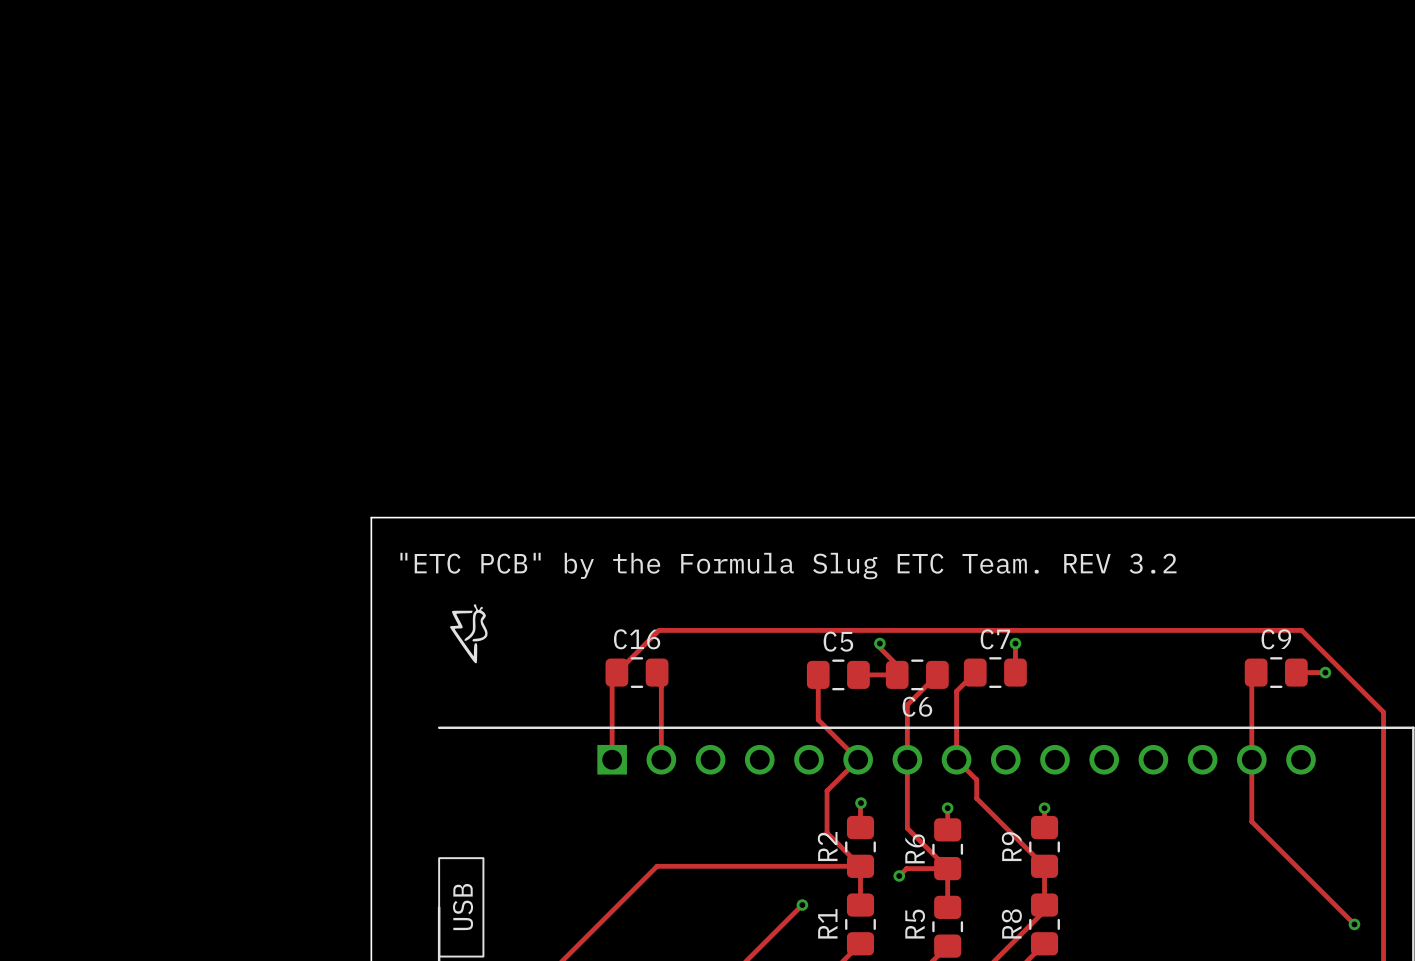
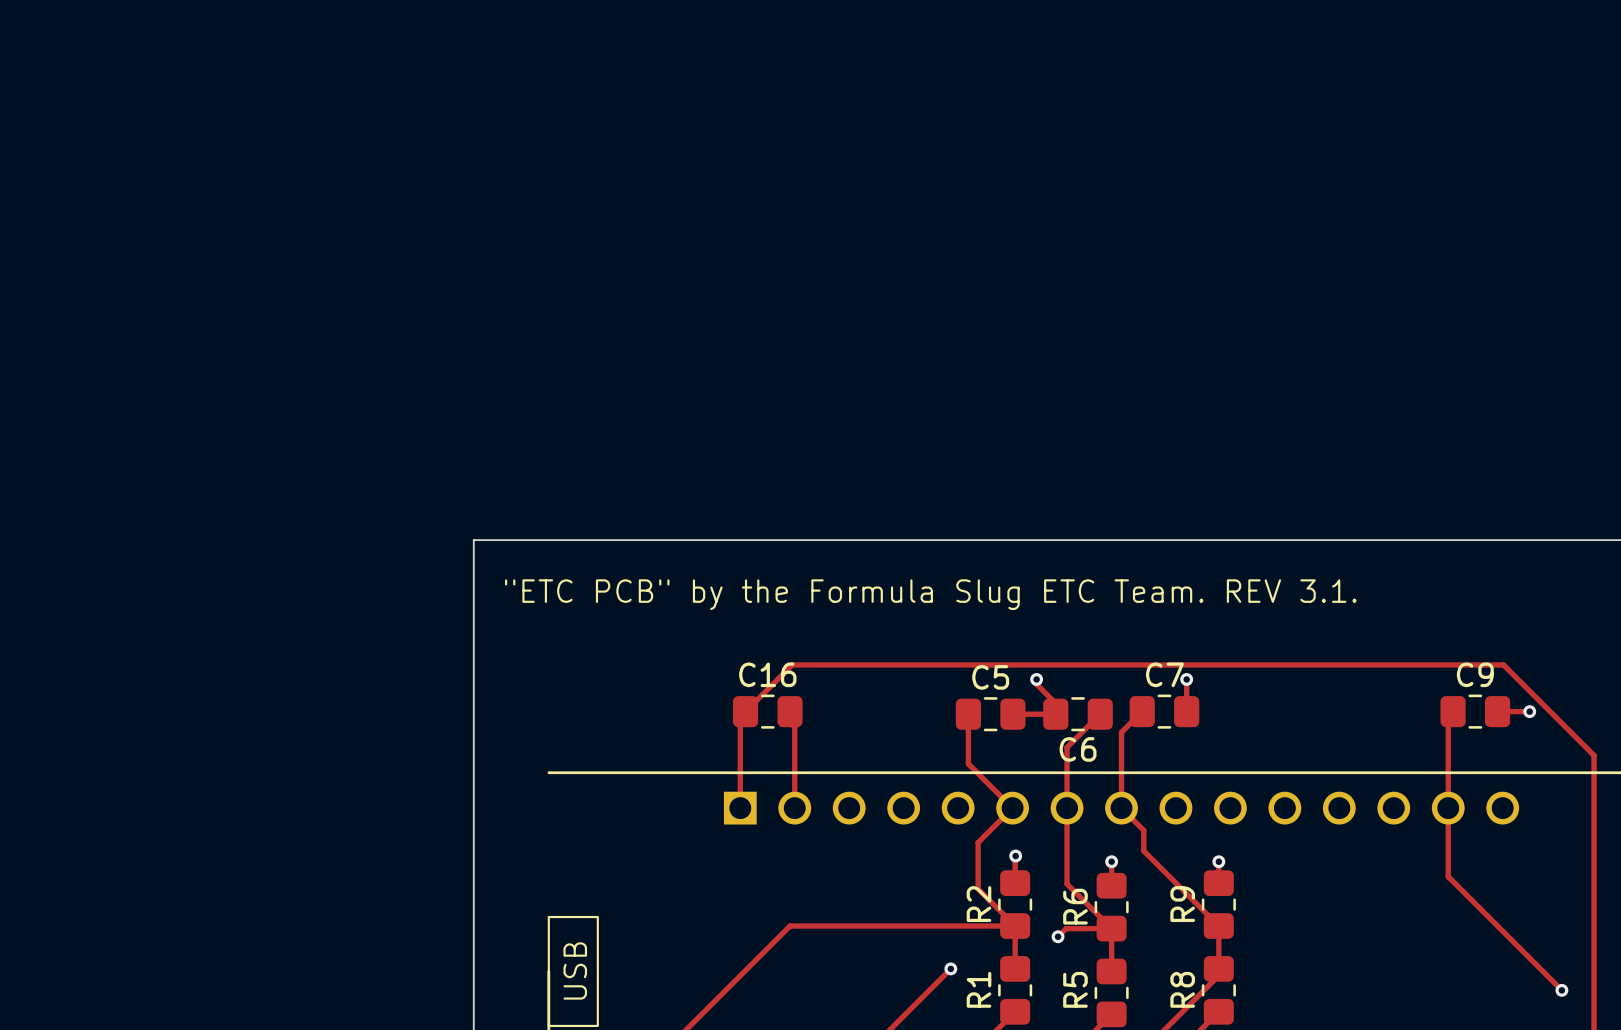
text: "ETC PCB" by the Formula Slug ETC Team. REV 3.2 (788, 566) -> "ETC PCB" by the Formula Slug ETC Team. REV 3.1. (930, 594)
drawing: [449, 604, 488, 664] -> none

